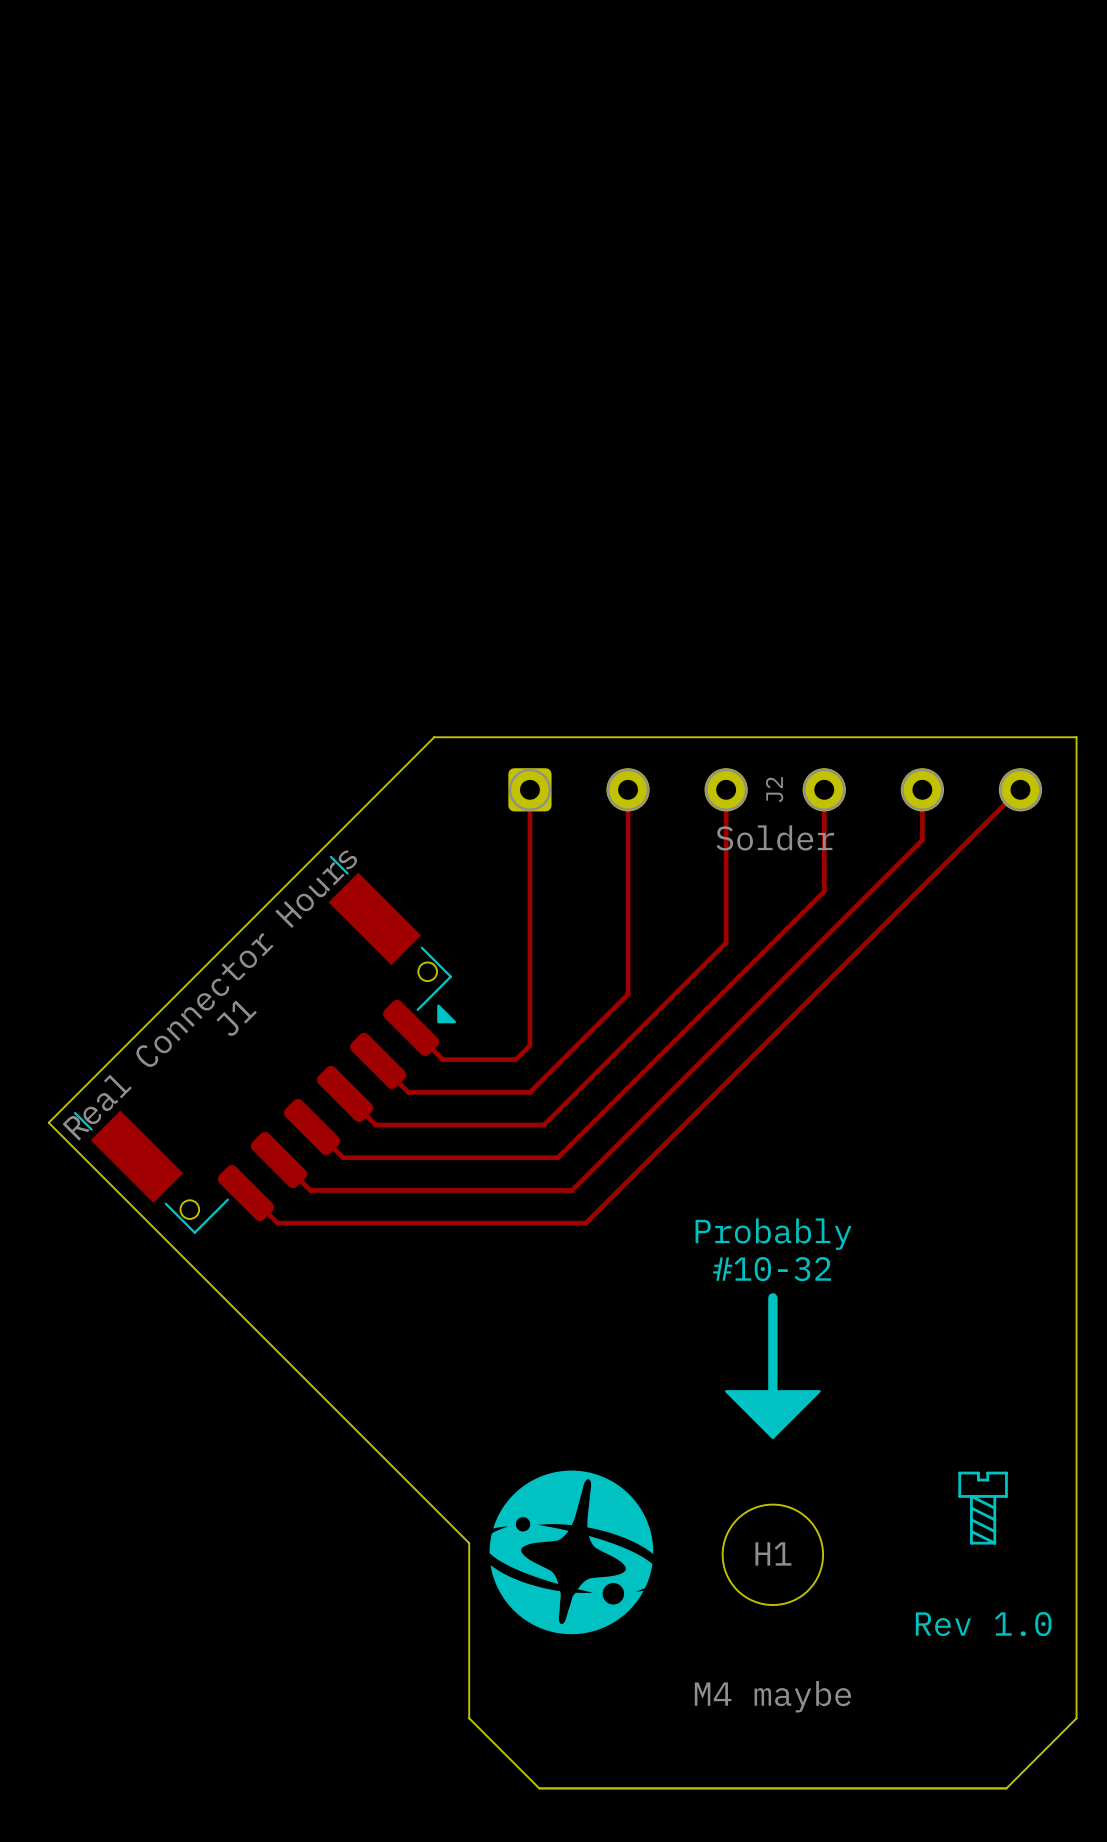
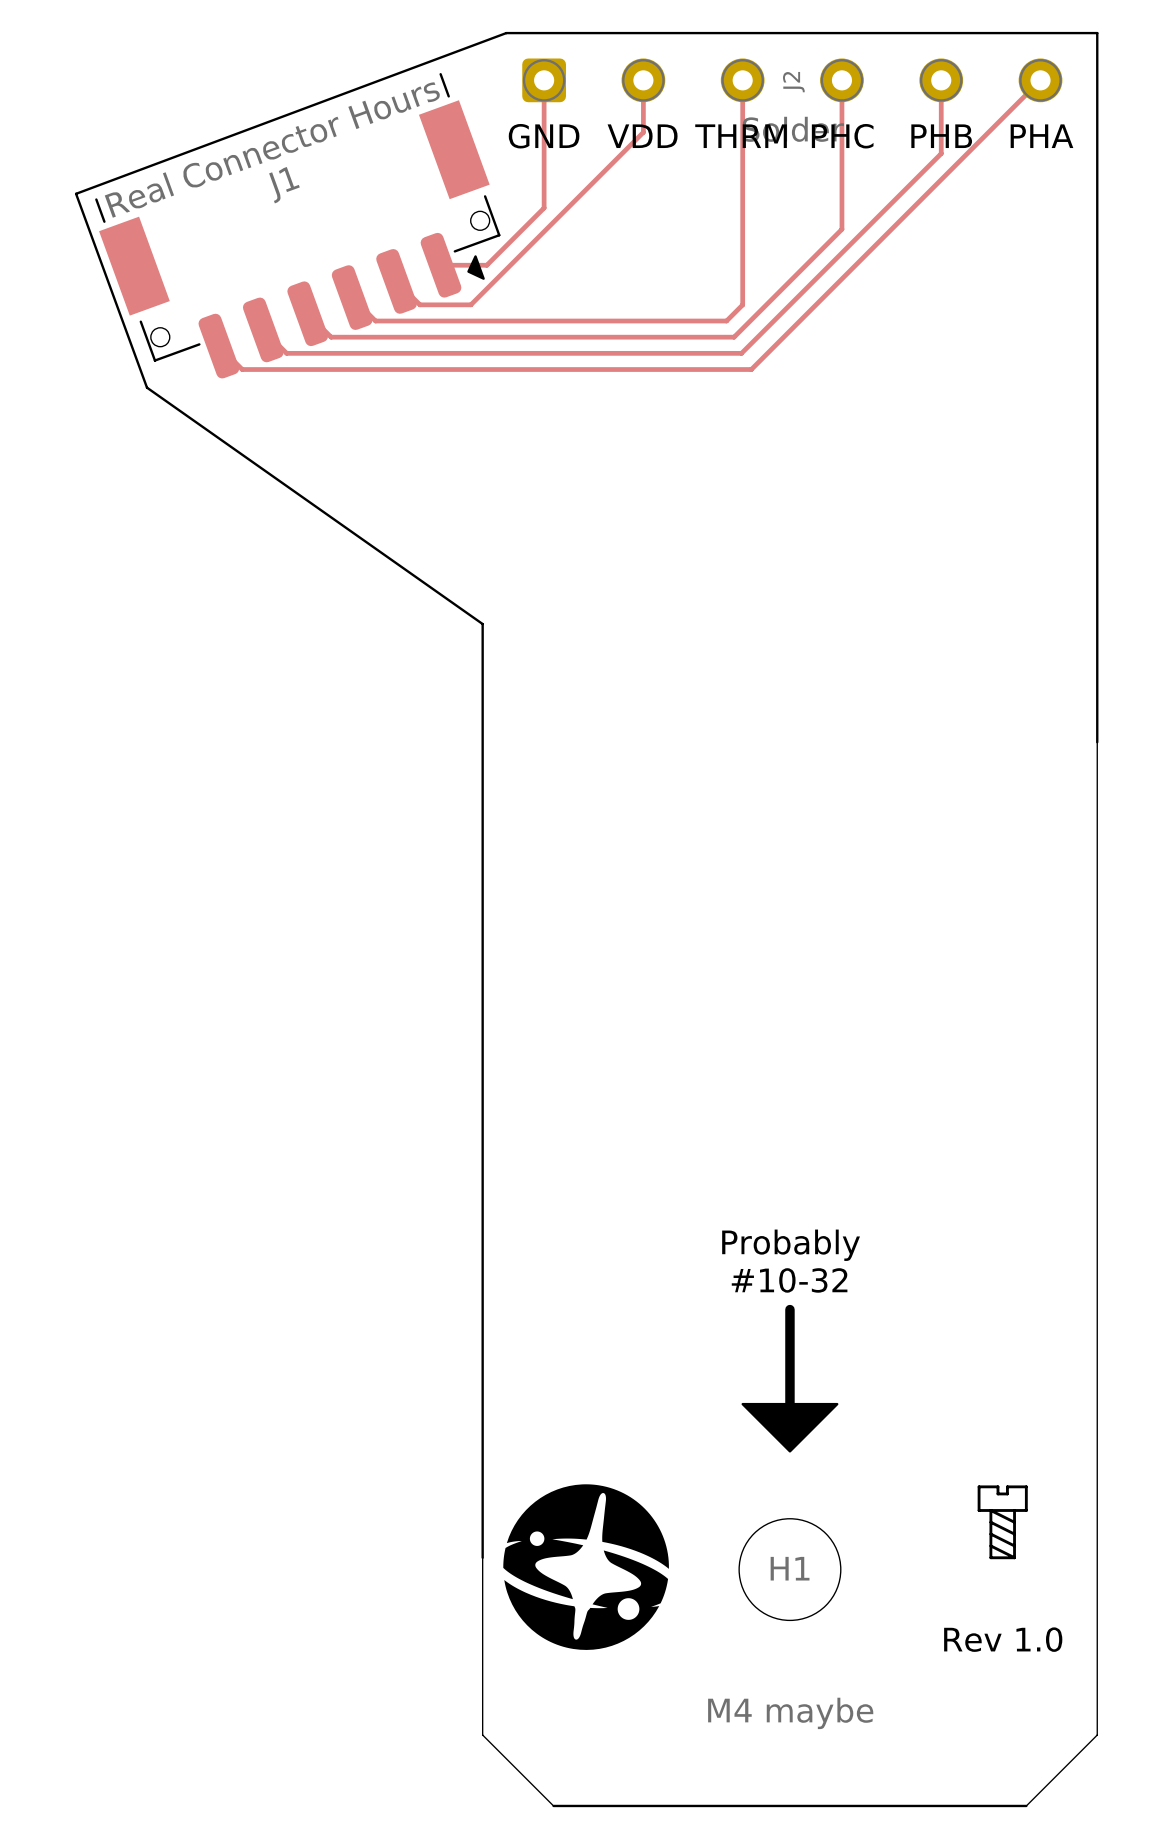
top track: none -> (544, 80) (544, 208) (486, 265) (441, 265)
top track: none -> (643, 80) (643, 132) (470, 304) (419, 304) (396, 281)
top track: none -> (742, 80) (742, 304) (726, 321) (375, 321) (352, 297)
top track: none -> (841, 80) (841, 229) (734, 337) (331, 337) (307, 313)
top track: none -> (941, 80) (941, 153) (741, 353) (286, 353) (263, 329)
top track: none -> (1040, 80) (751, 369) (242, 369) (218, 346)
text: none -> GND (544, 136)
text: none -> VDD (642, 136)
text: none -> THRM (741, 136)
text: none -> PHC (842, 136)
text: none -> PHB (941, 136)
text: none -> PHA (1041, 136)
board edge: (1076, 737) (434, 737) (48, 1122) (469, 1543) -> (1097, 742) (1097, 33) (506, 33) (76, 193) (146, 387) (482, 624) (482, 1557)
top track: (529, 789) (529, 1045) (515, 1059) (442, 1059) (411, 1027) -> none
top track: (628, 789) (628, 994) (529, 1092) (408, 1092) (378, 1060) -> none
top track: (726, 789) (726, 942) (543, 1125) (375, 1125) (345, 1094) -> none
J2 position: (775, 789) -> (792, 80)
top track: (824, 789) (824, 891) (557, 1157) (343, 1157) (312, 1127) -> none
top track: (922, 789) (922, 840) (571, 1190) (310, 1190) (279, 1160) -> none
top track: (1020, 789) (586, 1223) (277, 1223) (245, 1193) -> none
J1 rotation: 0° (264, 1044) -> 25° clockwise (297, 225)
J1 position: (264, 1044) -> (297, 225)

